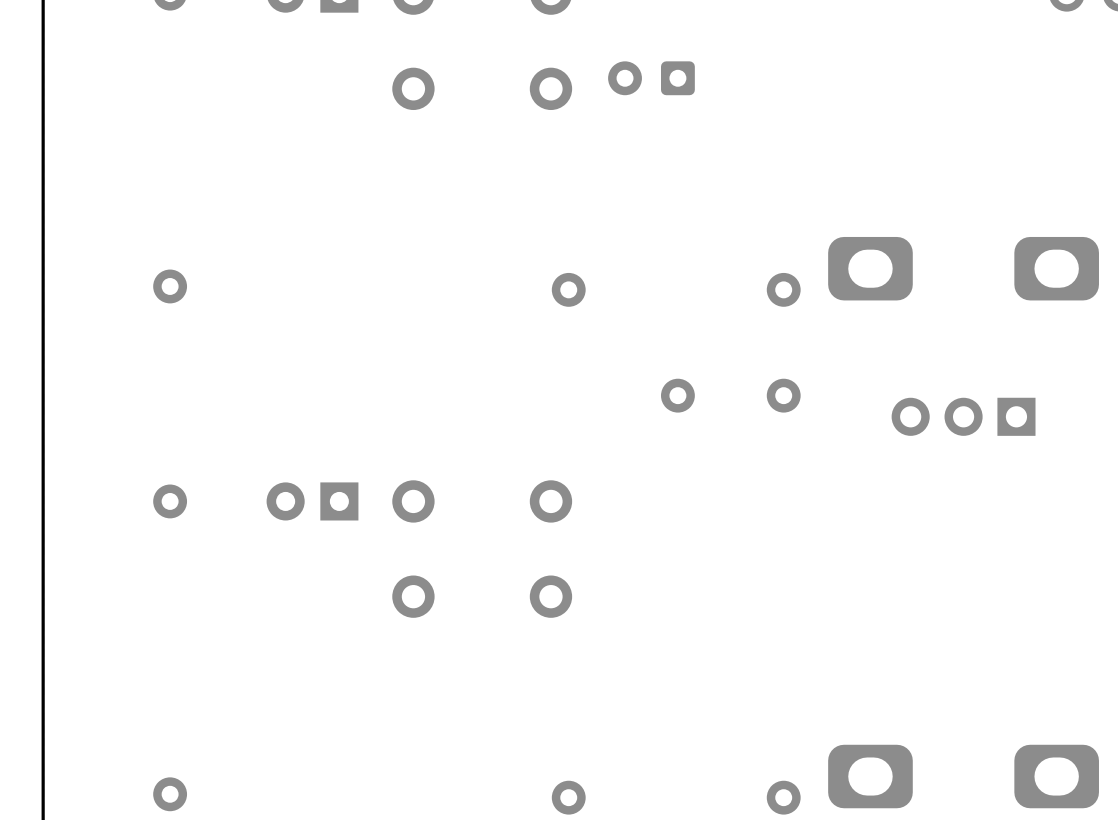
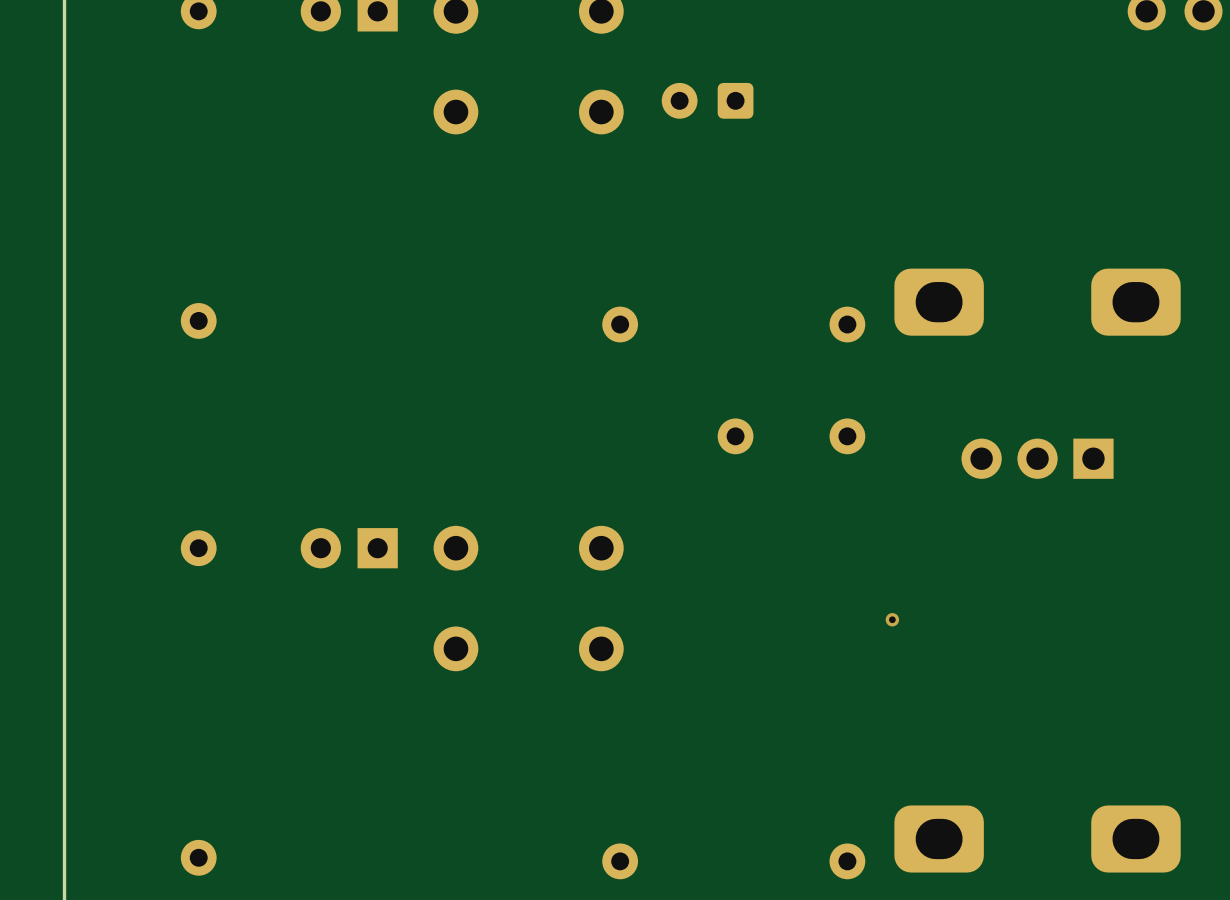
via: none -> (892, 619)

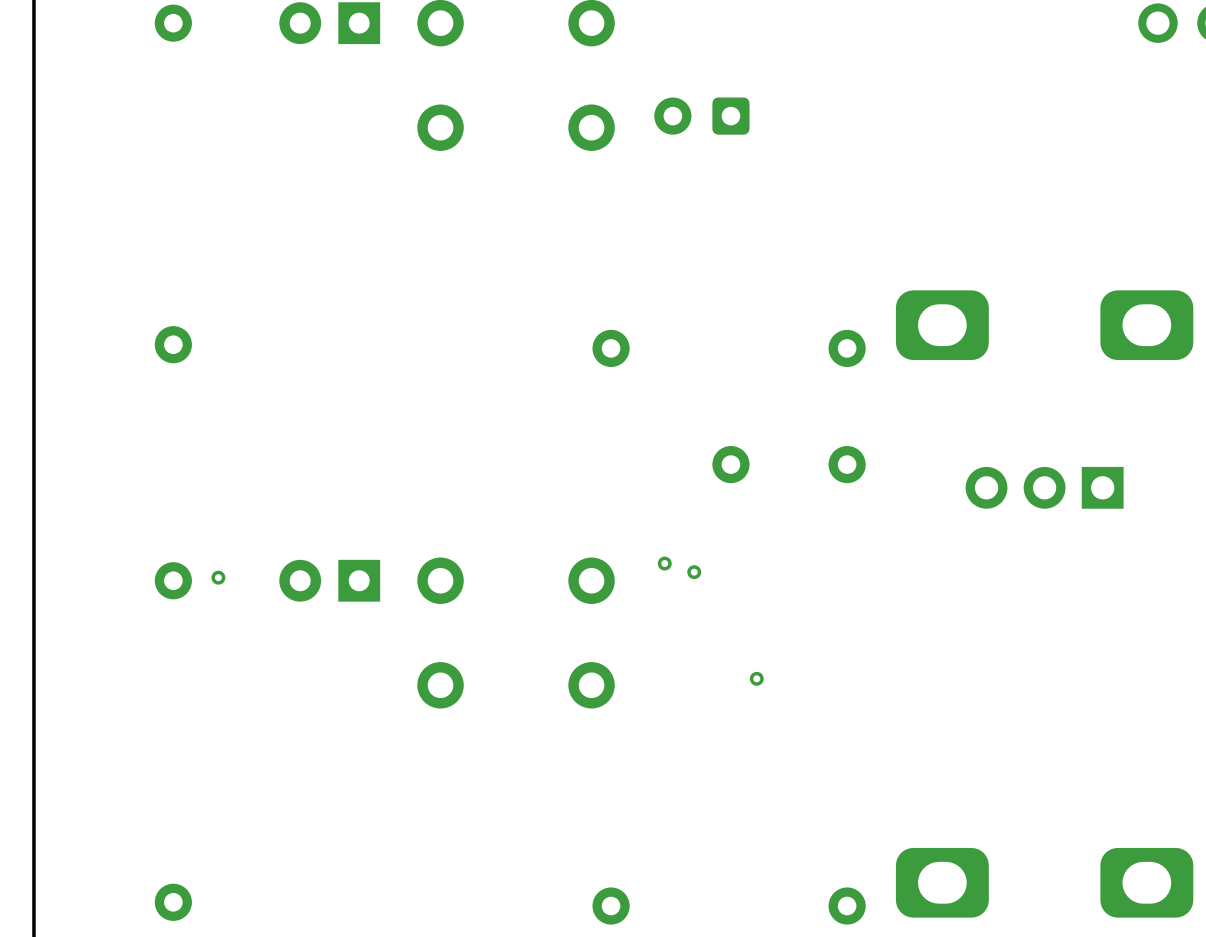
via: none -> (664, 563)
via: none -> (694, 572)
via: none -> (218, 577)
via: (892, 619) -> none
via: none -> (756, 678)

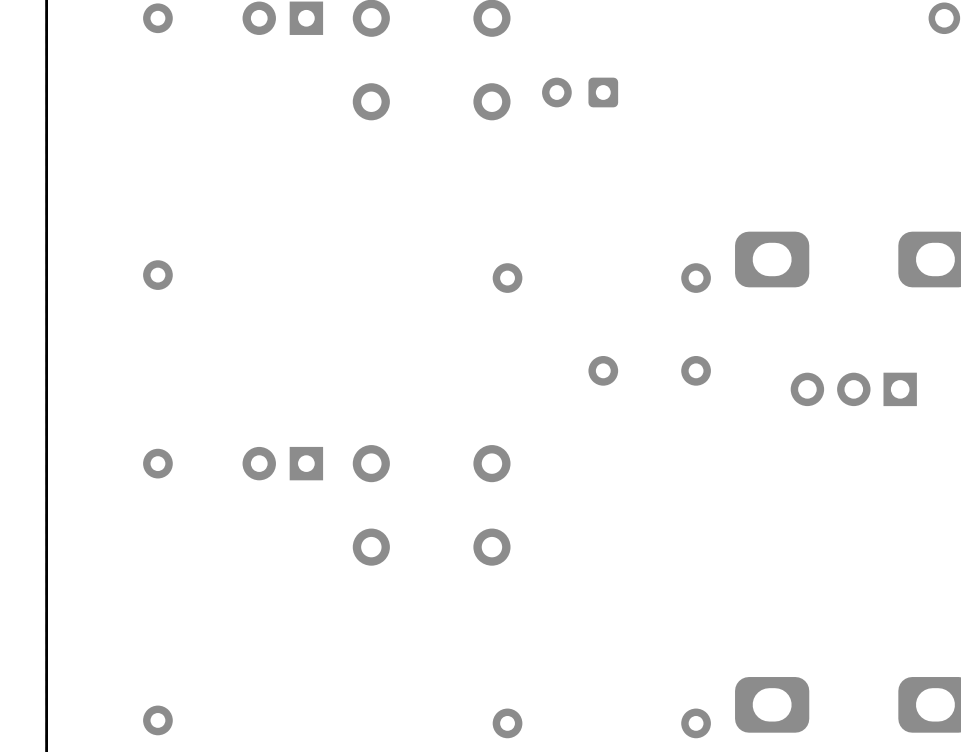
via: (664, 563) -> none
via: (694, 572) -> none
via: (218, 577) -> none
via: (756, 678) -> none

